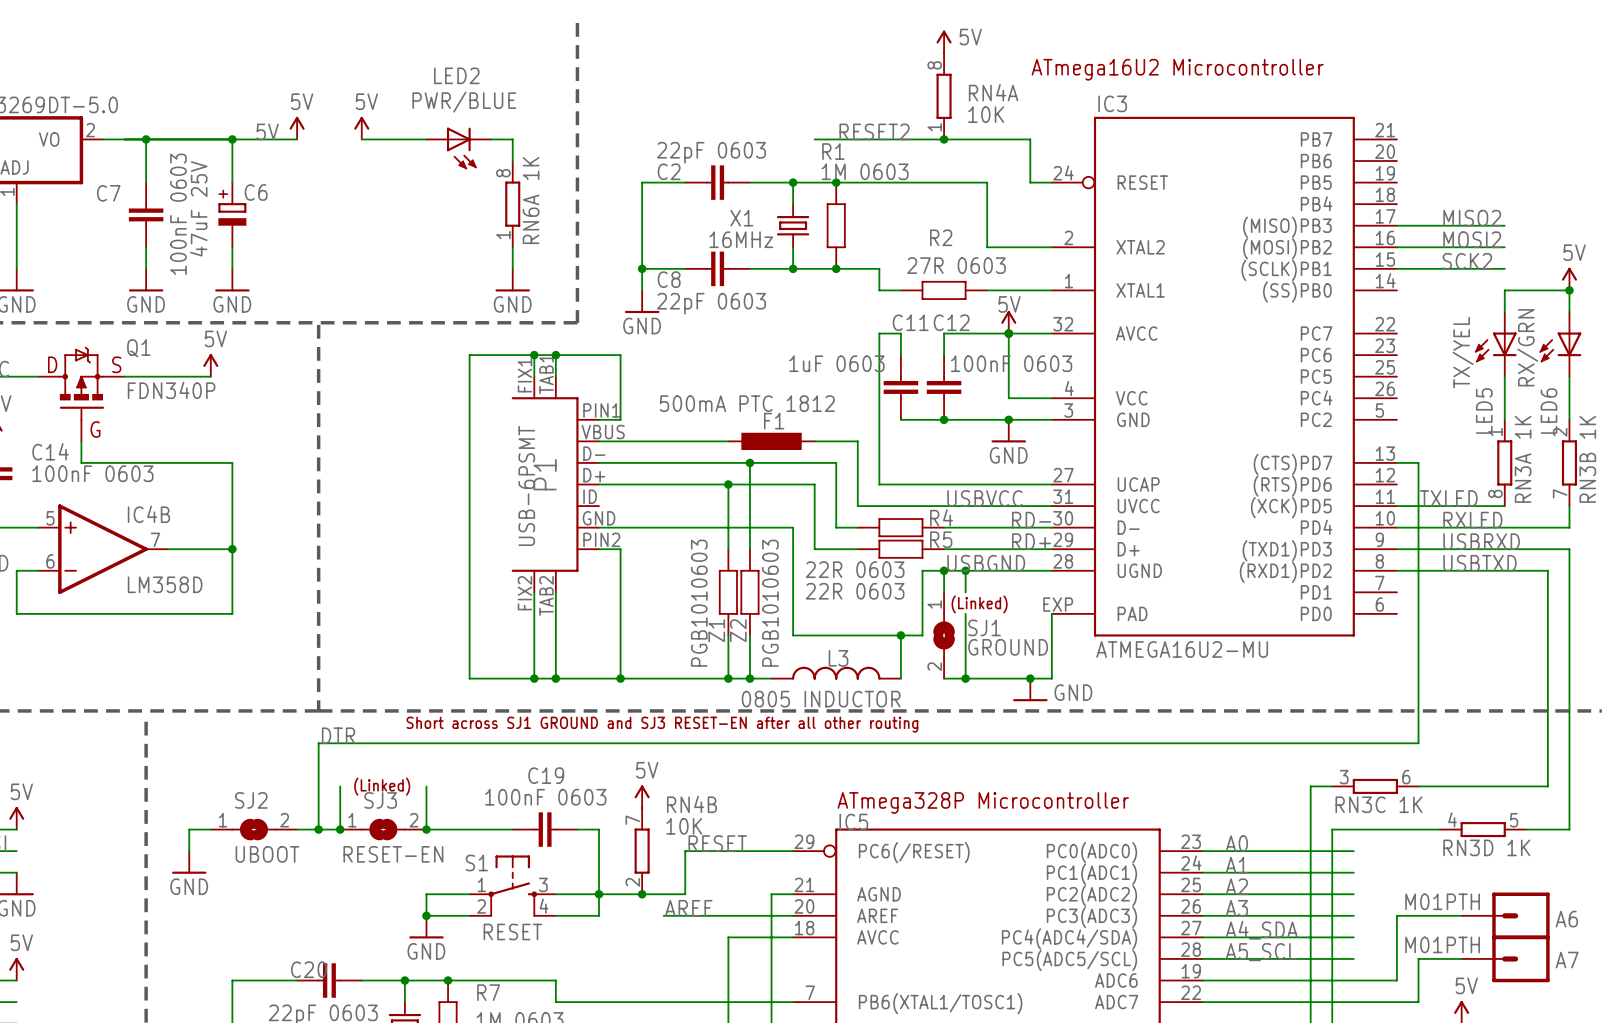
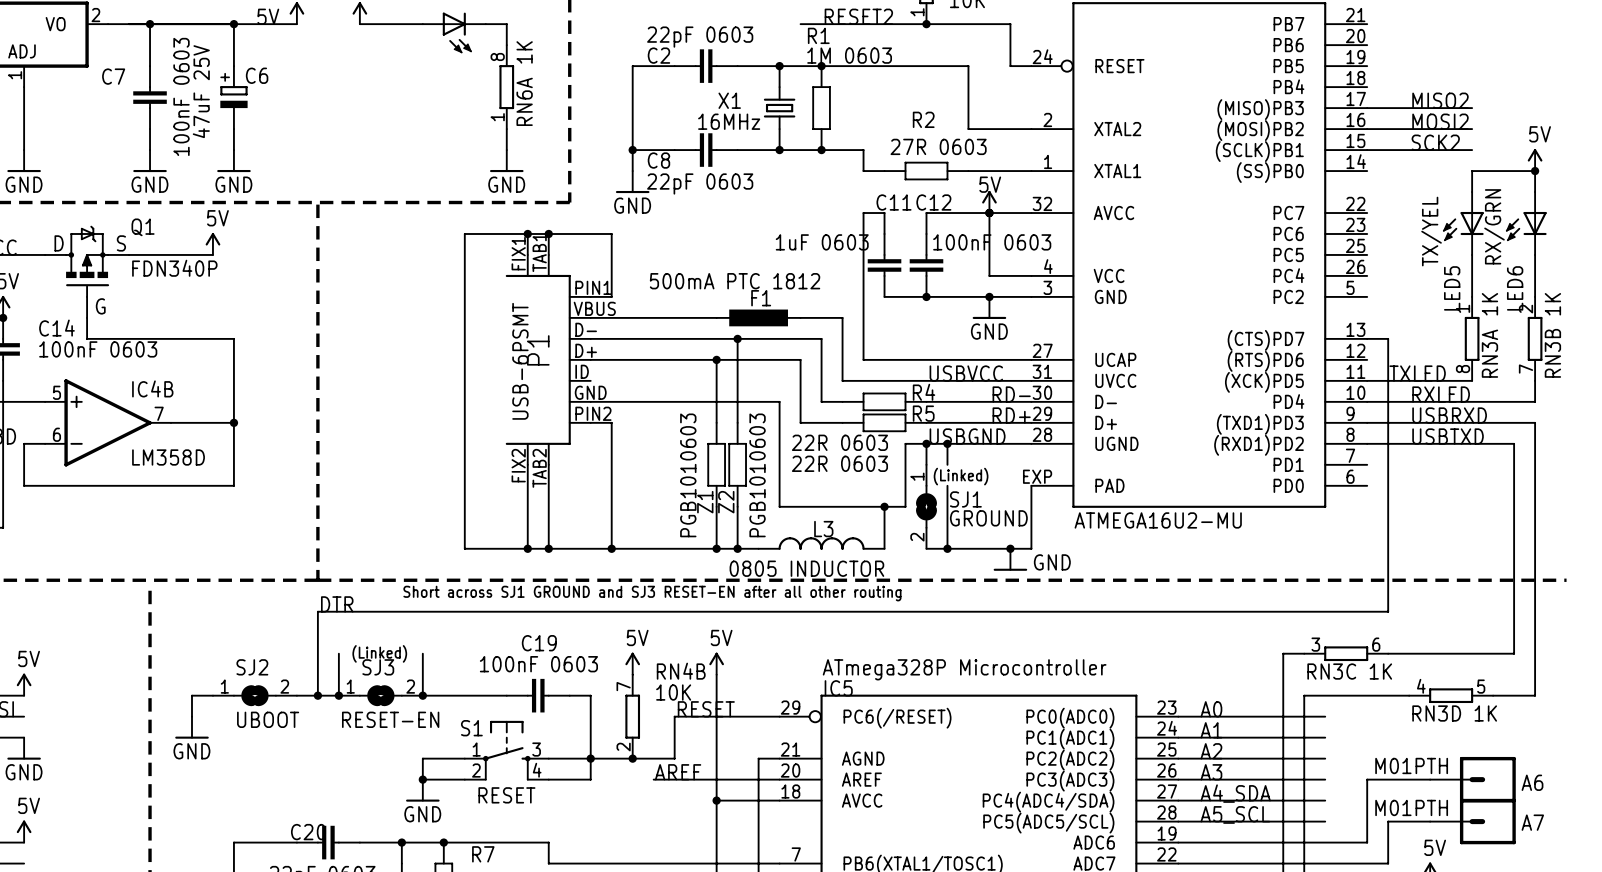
power symbol: none -> 5V (716, 663)
wire: none -> (716, 674) (716, 800)
junction: none -> (716, 800)

